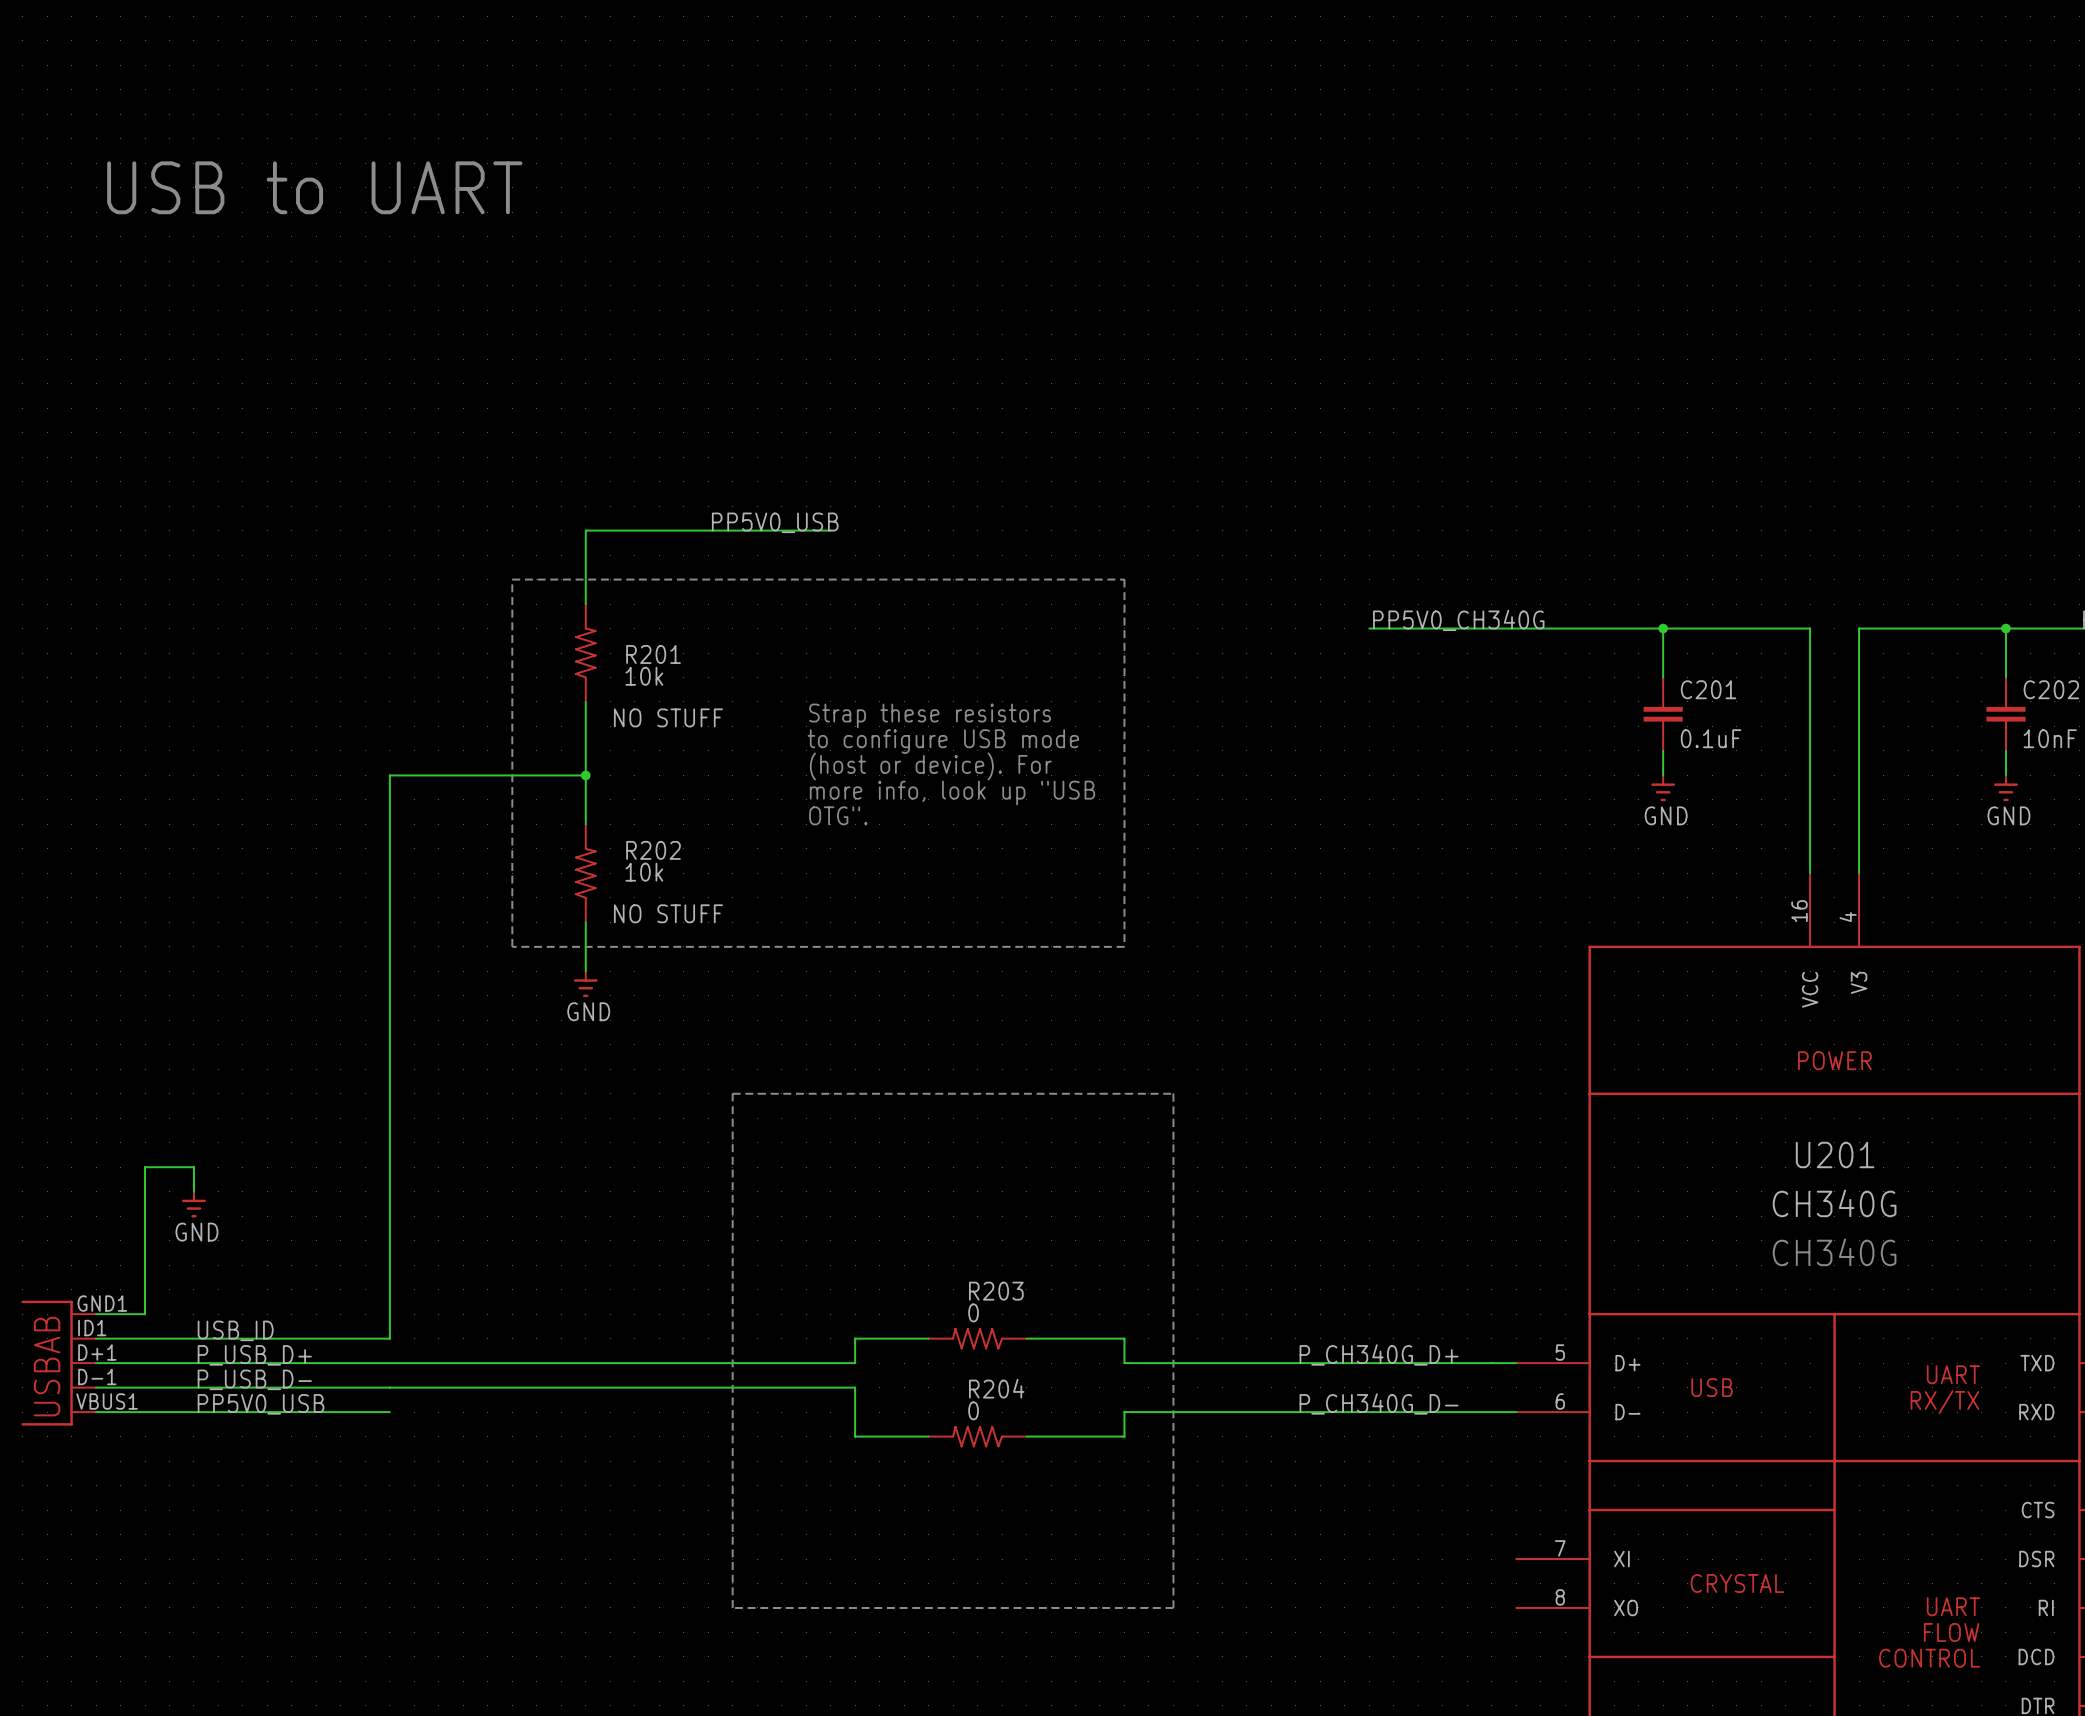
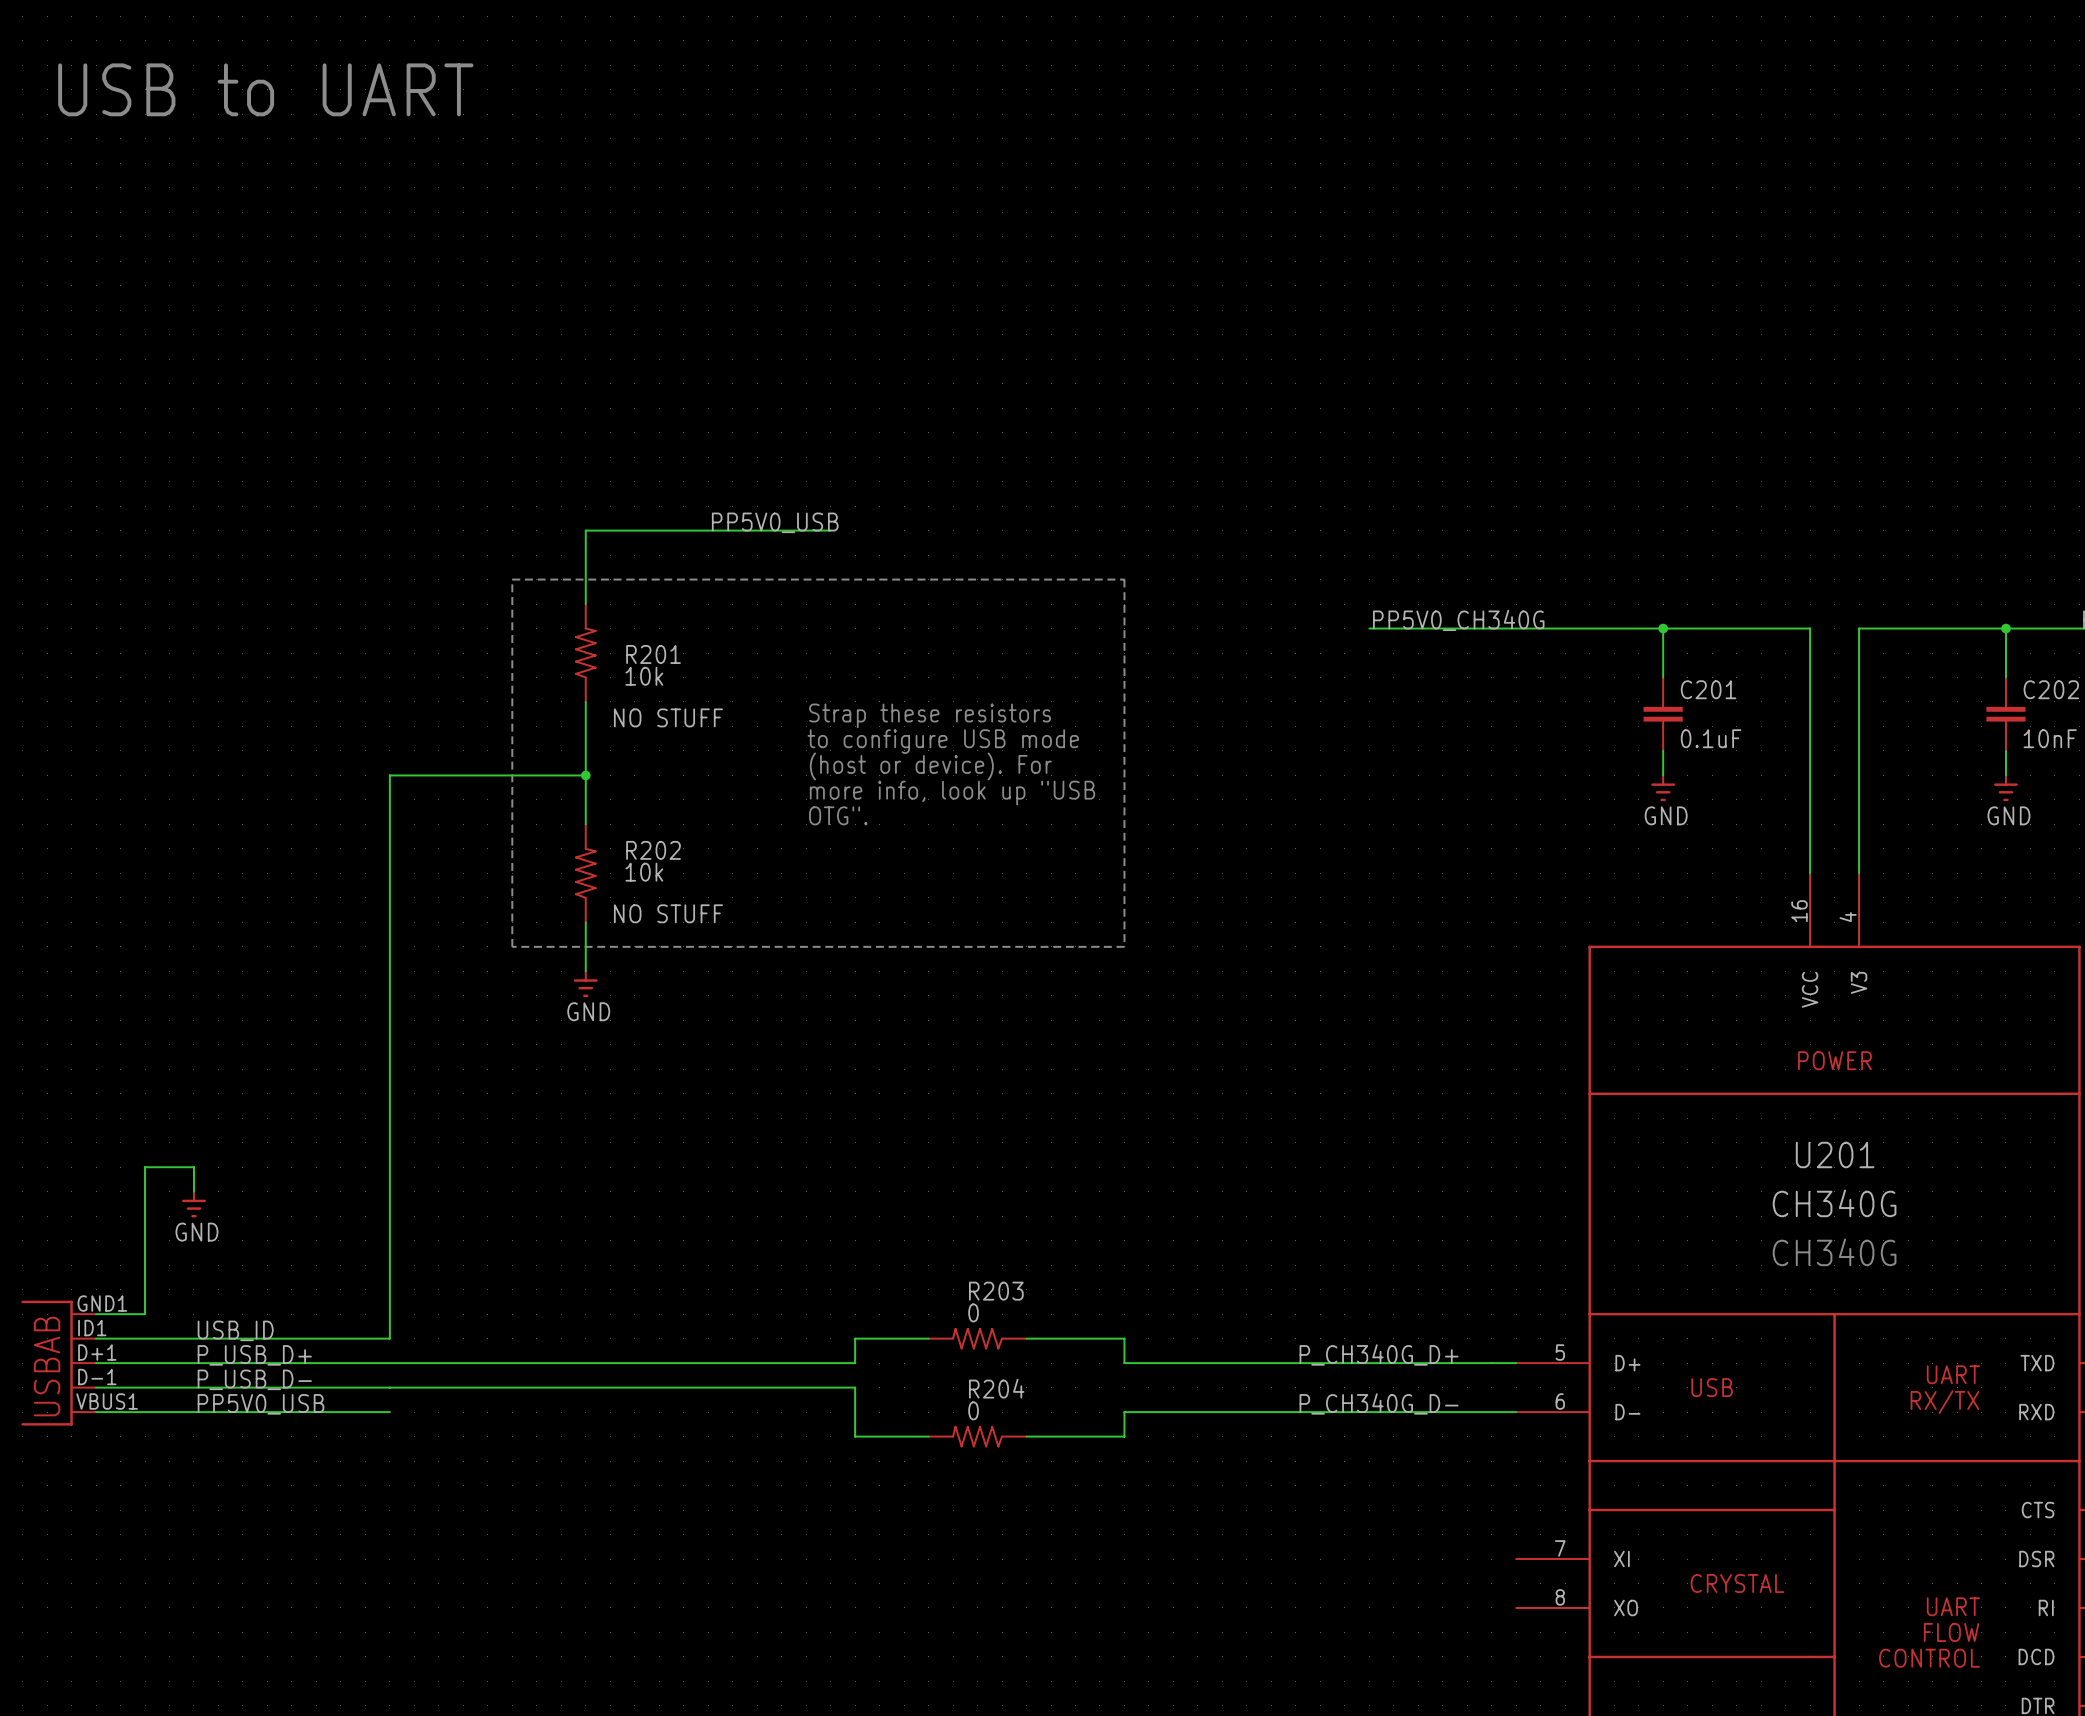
text position: USB to UART (314, 187) -> USB to UART (265, 89)
line: (732, 1093) (1173, 1093) (1173, 1607) (732, 1607) (732, 1093) -> none

